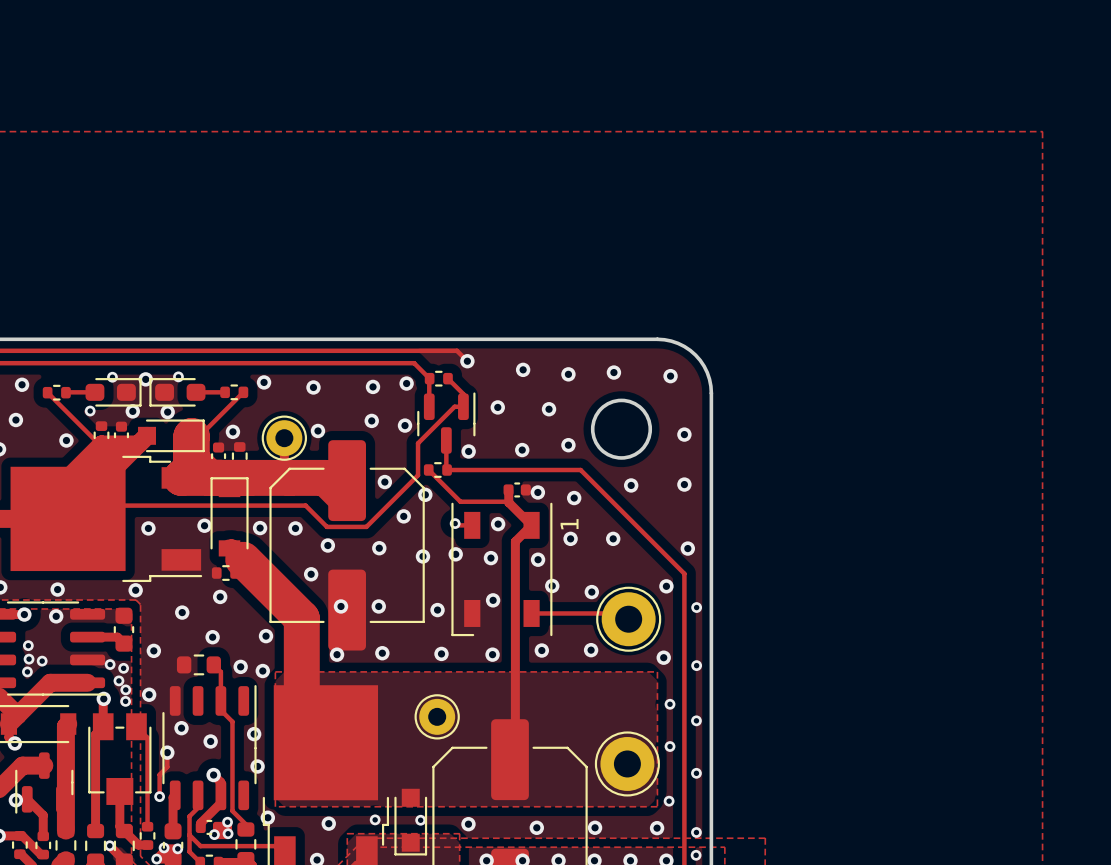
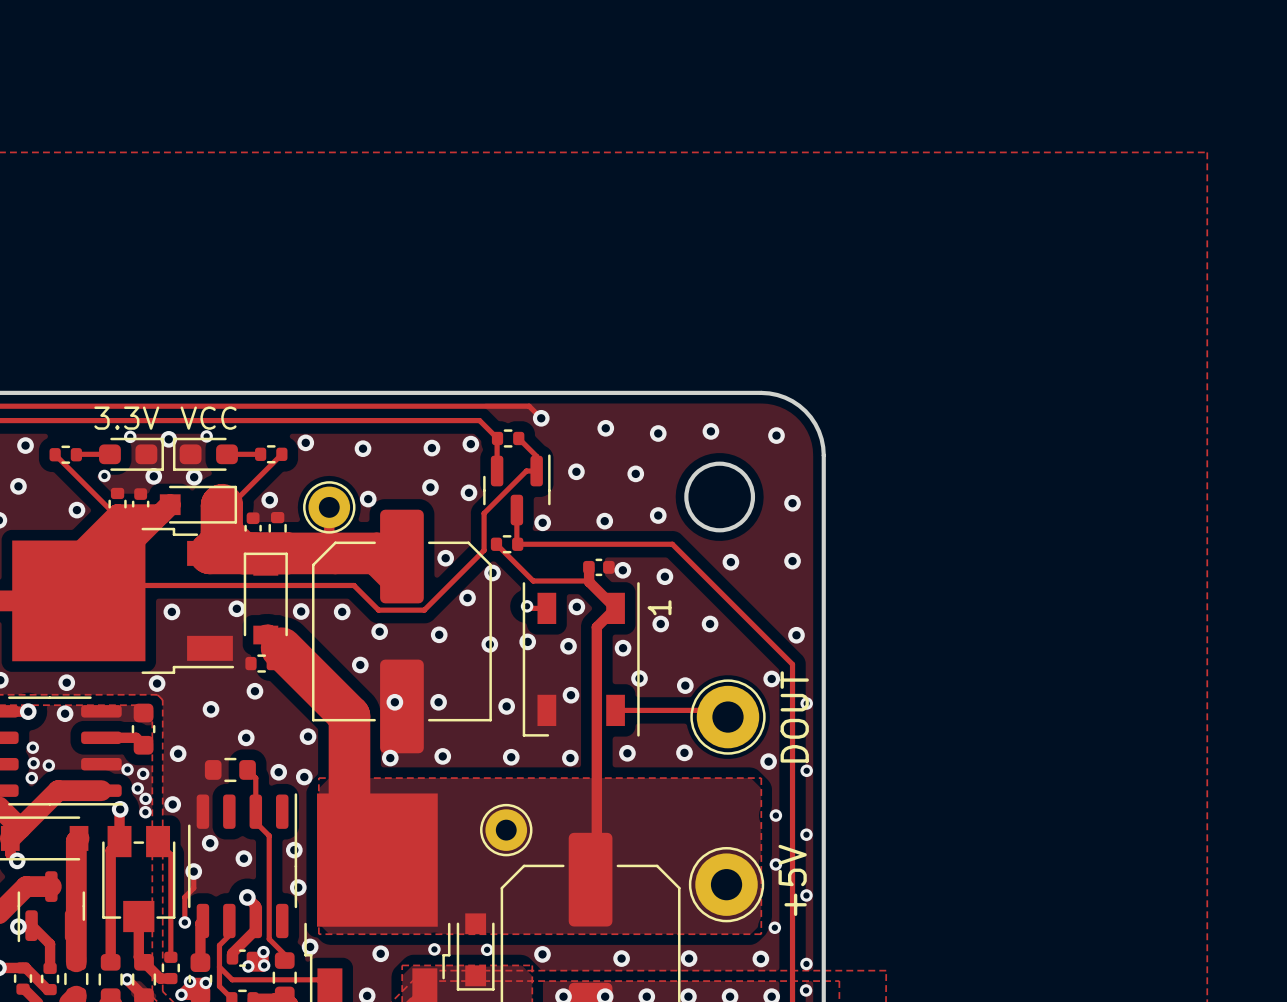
text: none -> 3.3V (126, 418)
text: none -> VCC (208, 418)
text: none -> DOUT (794, 716)
text: none -> +5V (792, 880)

